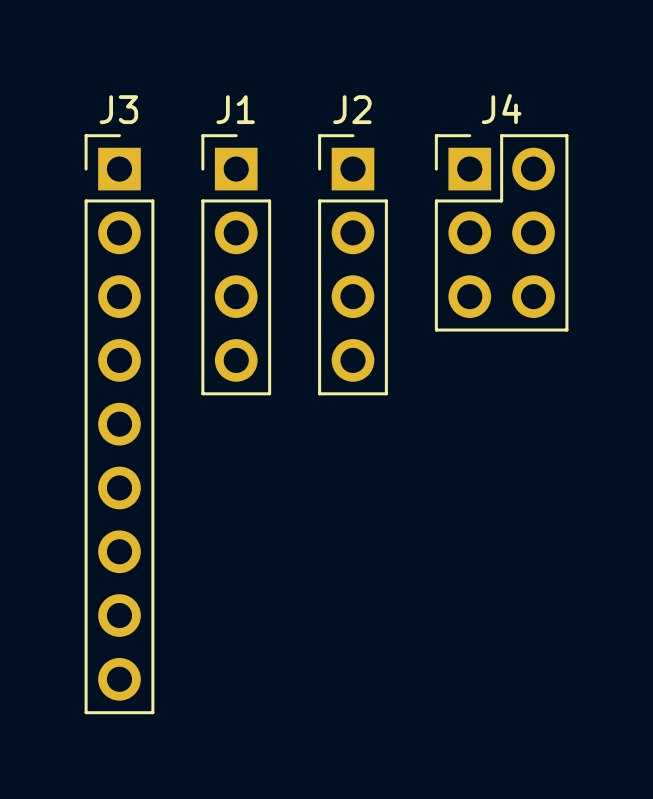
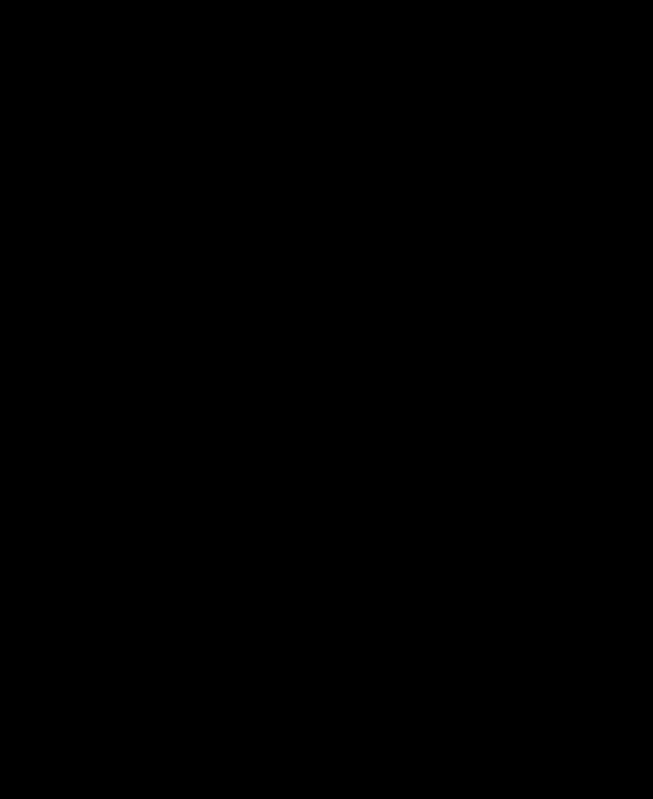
J4: (501, 232) -> none
J1: (236, 264) -> none
J2: (353, 264) -> none
J3: (119, 424) -> none

